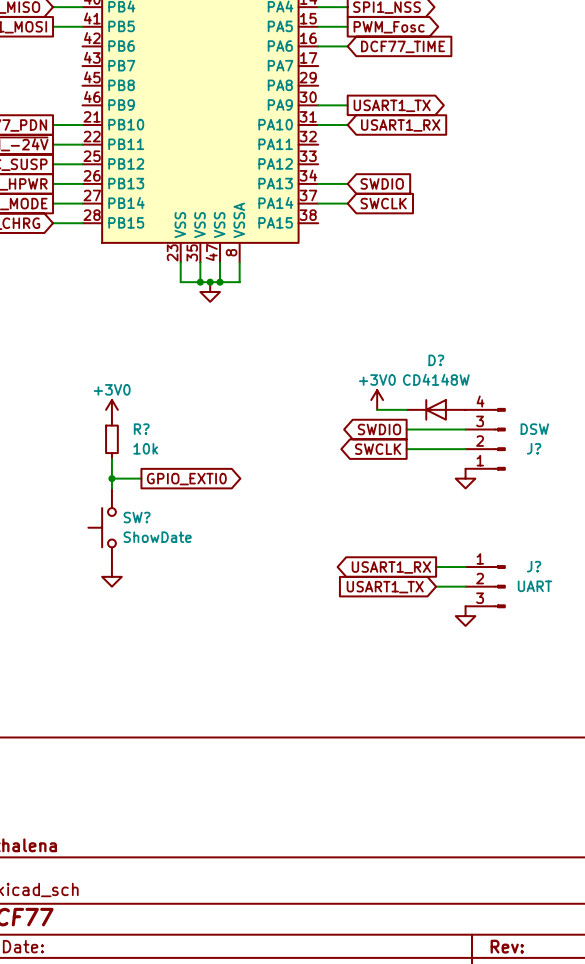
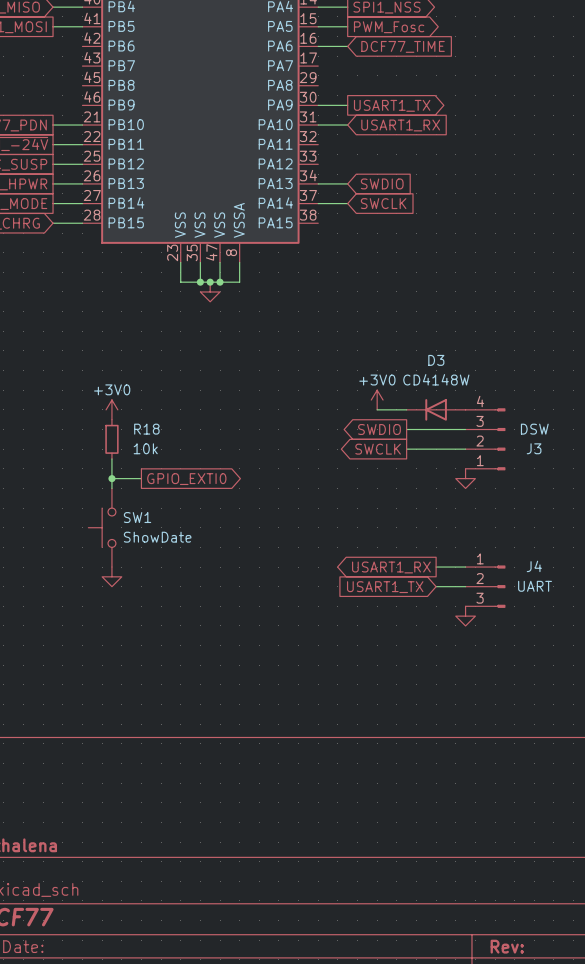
D? name: D? (436, 360) -> D3 (436, 360)
R? name: R? (141, 429) -> R18 (146, 429)
J? name: J? (534, 448) -> J3 (534, 448)
SW? name: SW? (137, 517) -> SW1 (137, 517)
J? name: J? (534, 566) -> J4 (534, 566)

